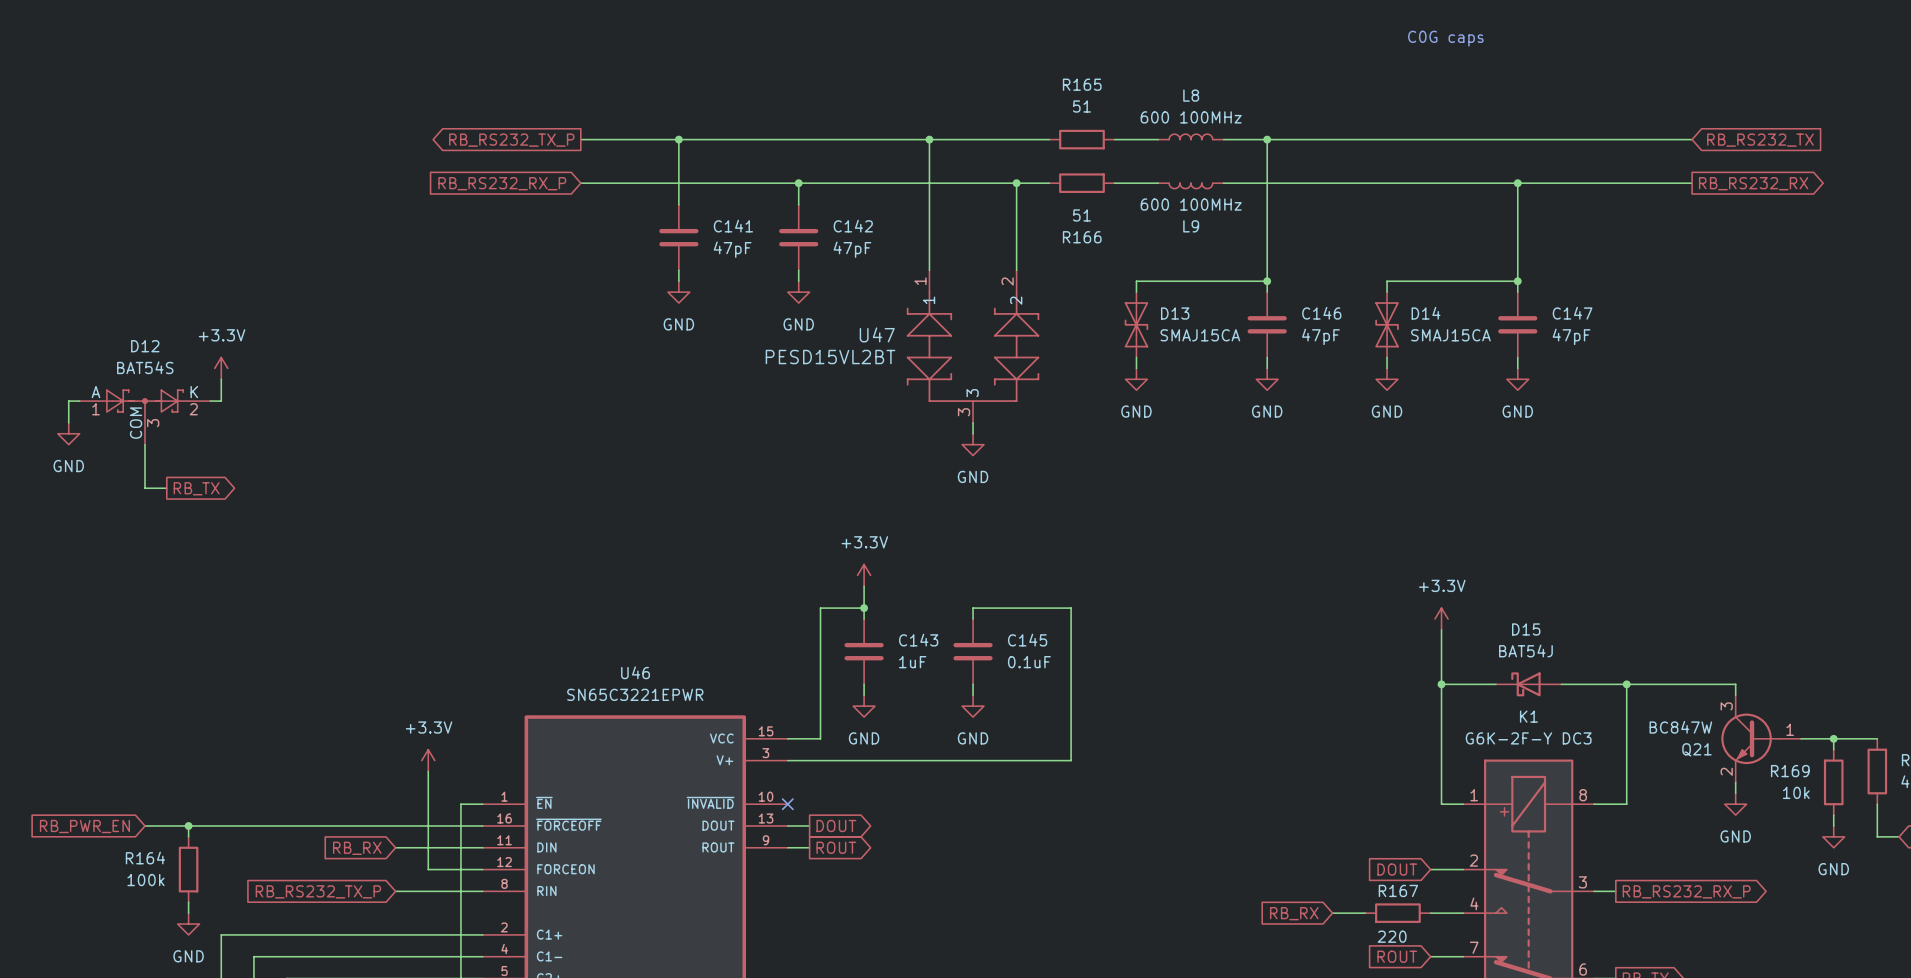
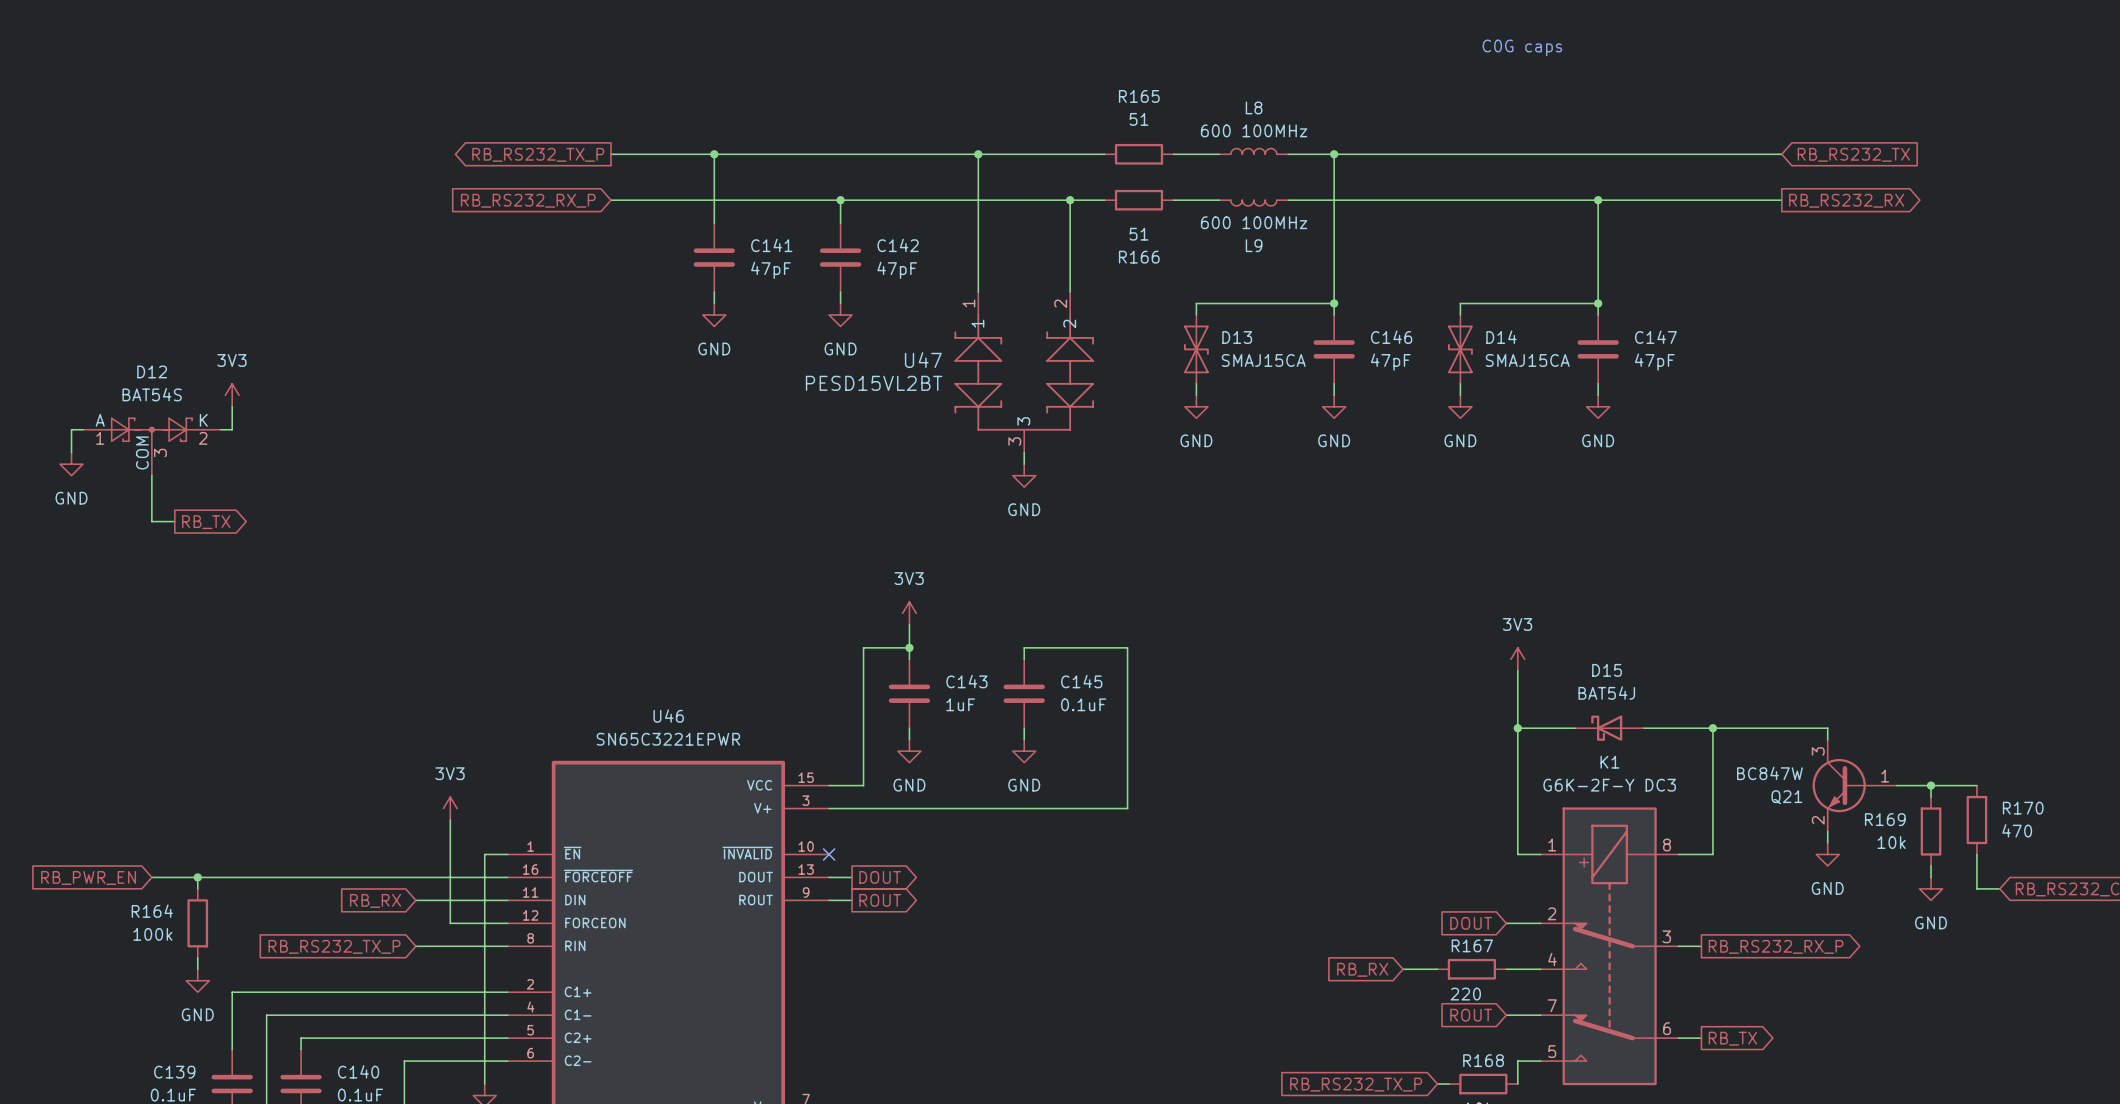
power symbol: +3.3V (221, 368) -> 3V3 (232, 395)
power symbol: +3.3V (864, 575) -> 3V3 (909, 613)
power symbol: +3.3V (1441, 618) -> 3V3 (1517, 659)
power symbol: +3.3V (428, 760) -> 3V3 (450, 808)

